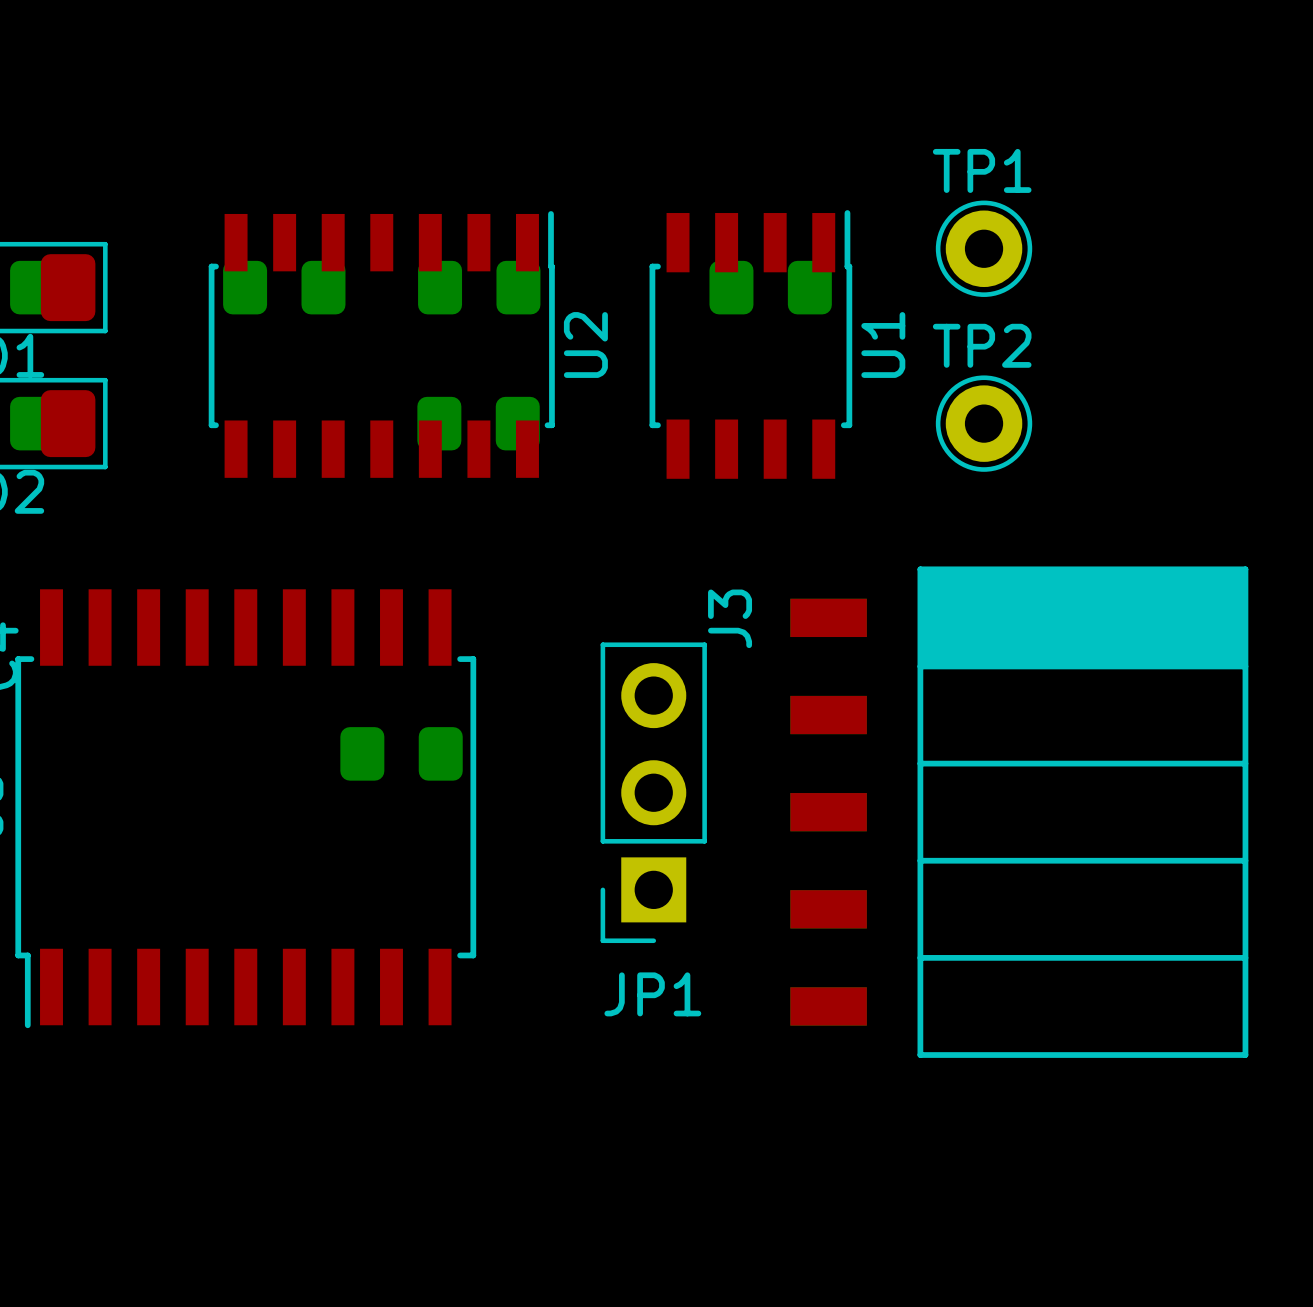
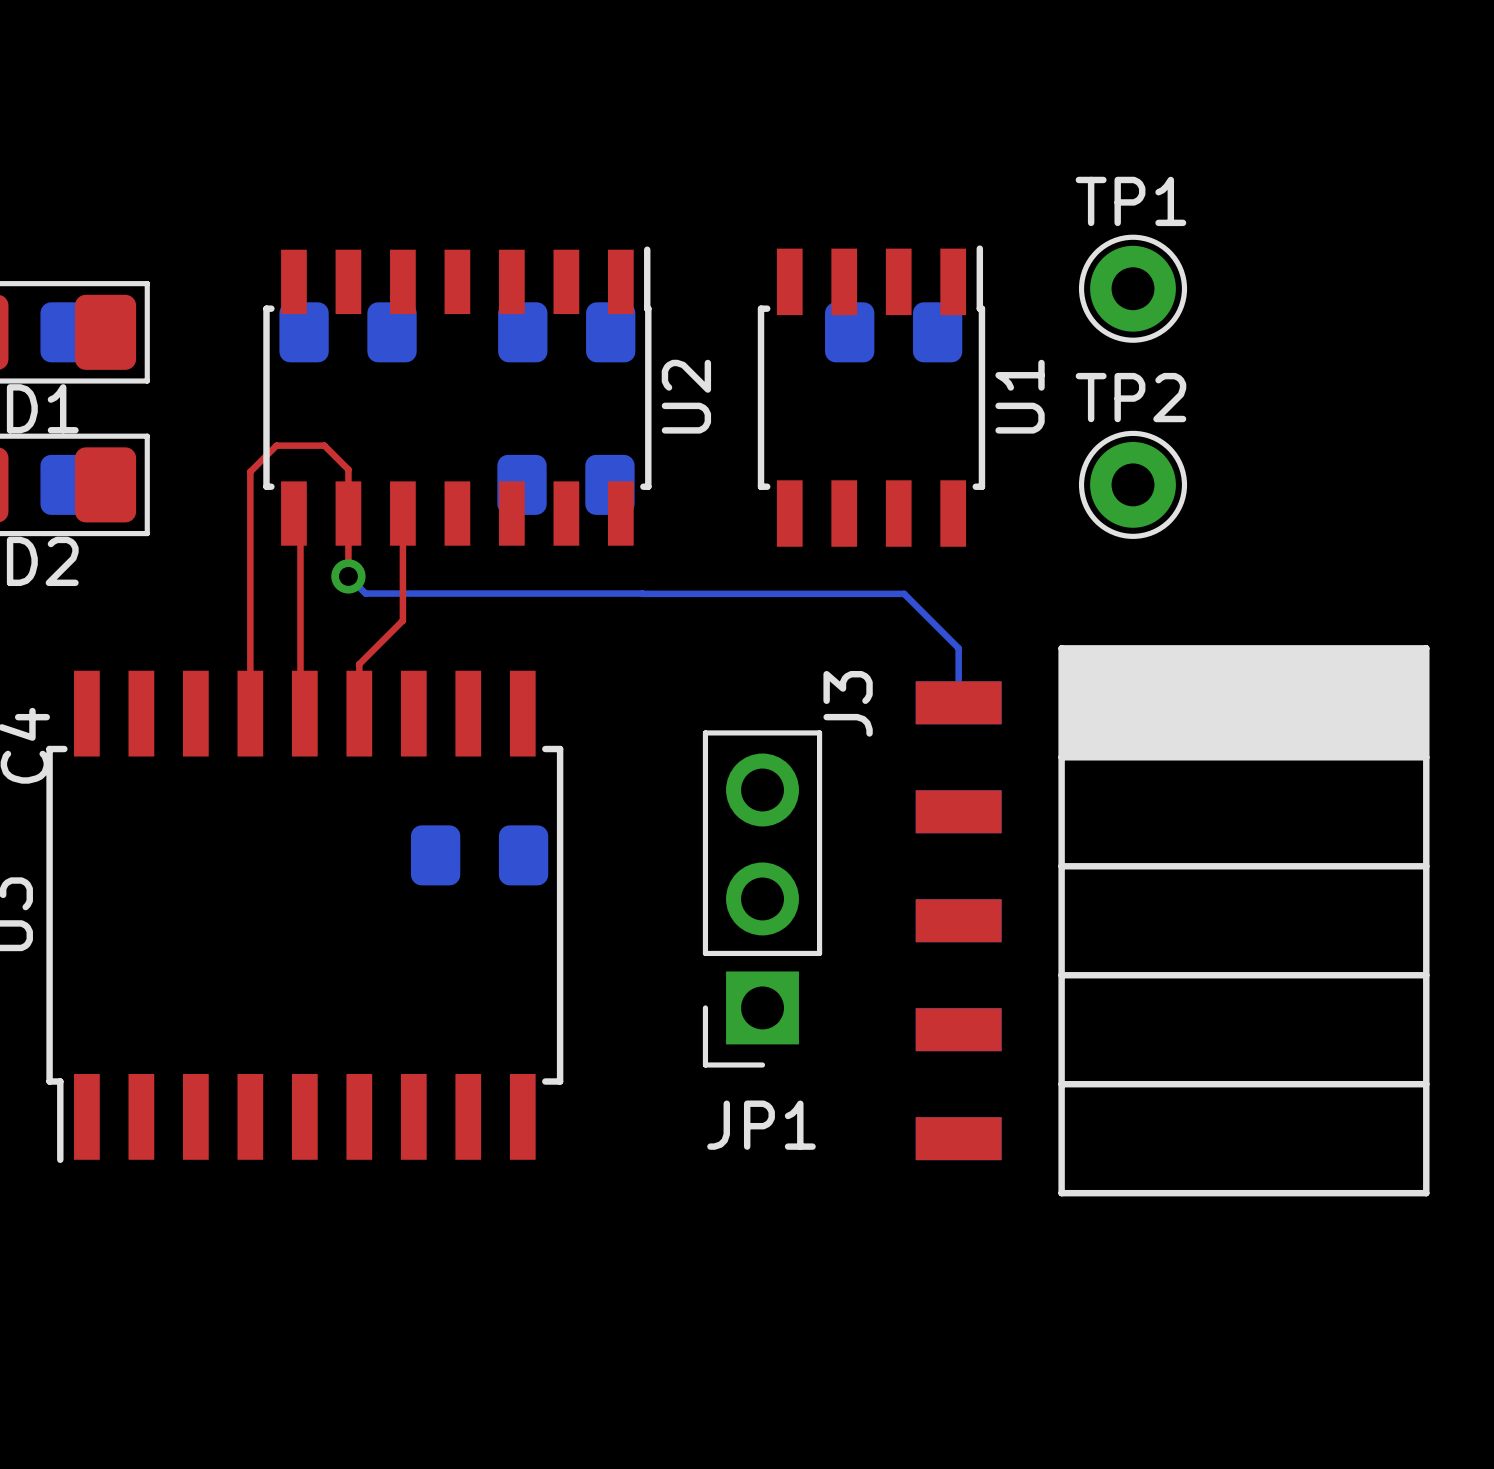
top track: none -> (293, 513) (300, 520) (300, 709) (304, 713)
top track: none -> (402, 513) (402, 620) (359, 664) (359, 713)
top track: none -> (348, 576) (348, 469) (324, 445) (276, 445) (250, 471) (250, 713)
bottom track: none -> (348, 576) (365, 593) (642, 593)
via: none -> (348, 576)
bottom track: none -> (642, 593) (904, 593) (958, 648) (958, 702)

